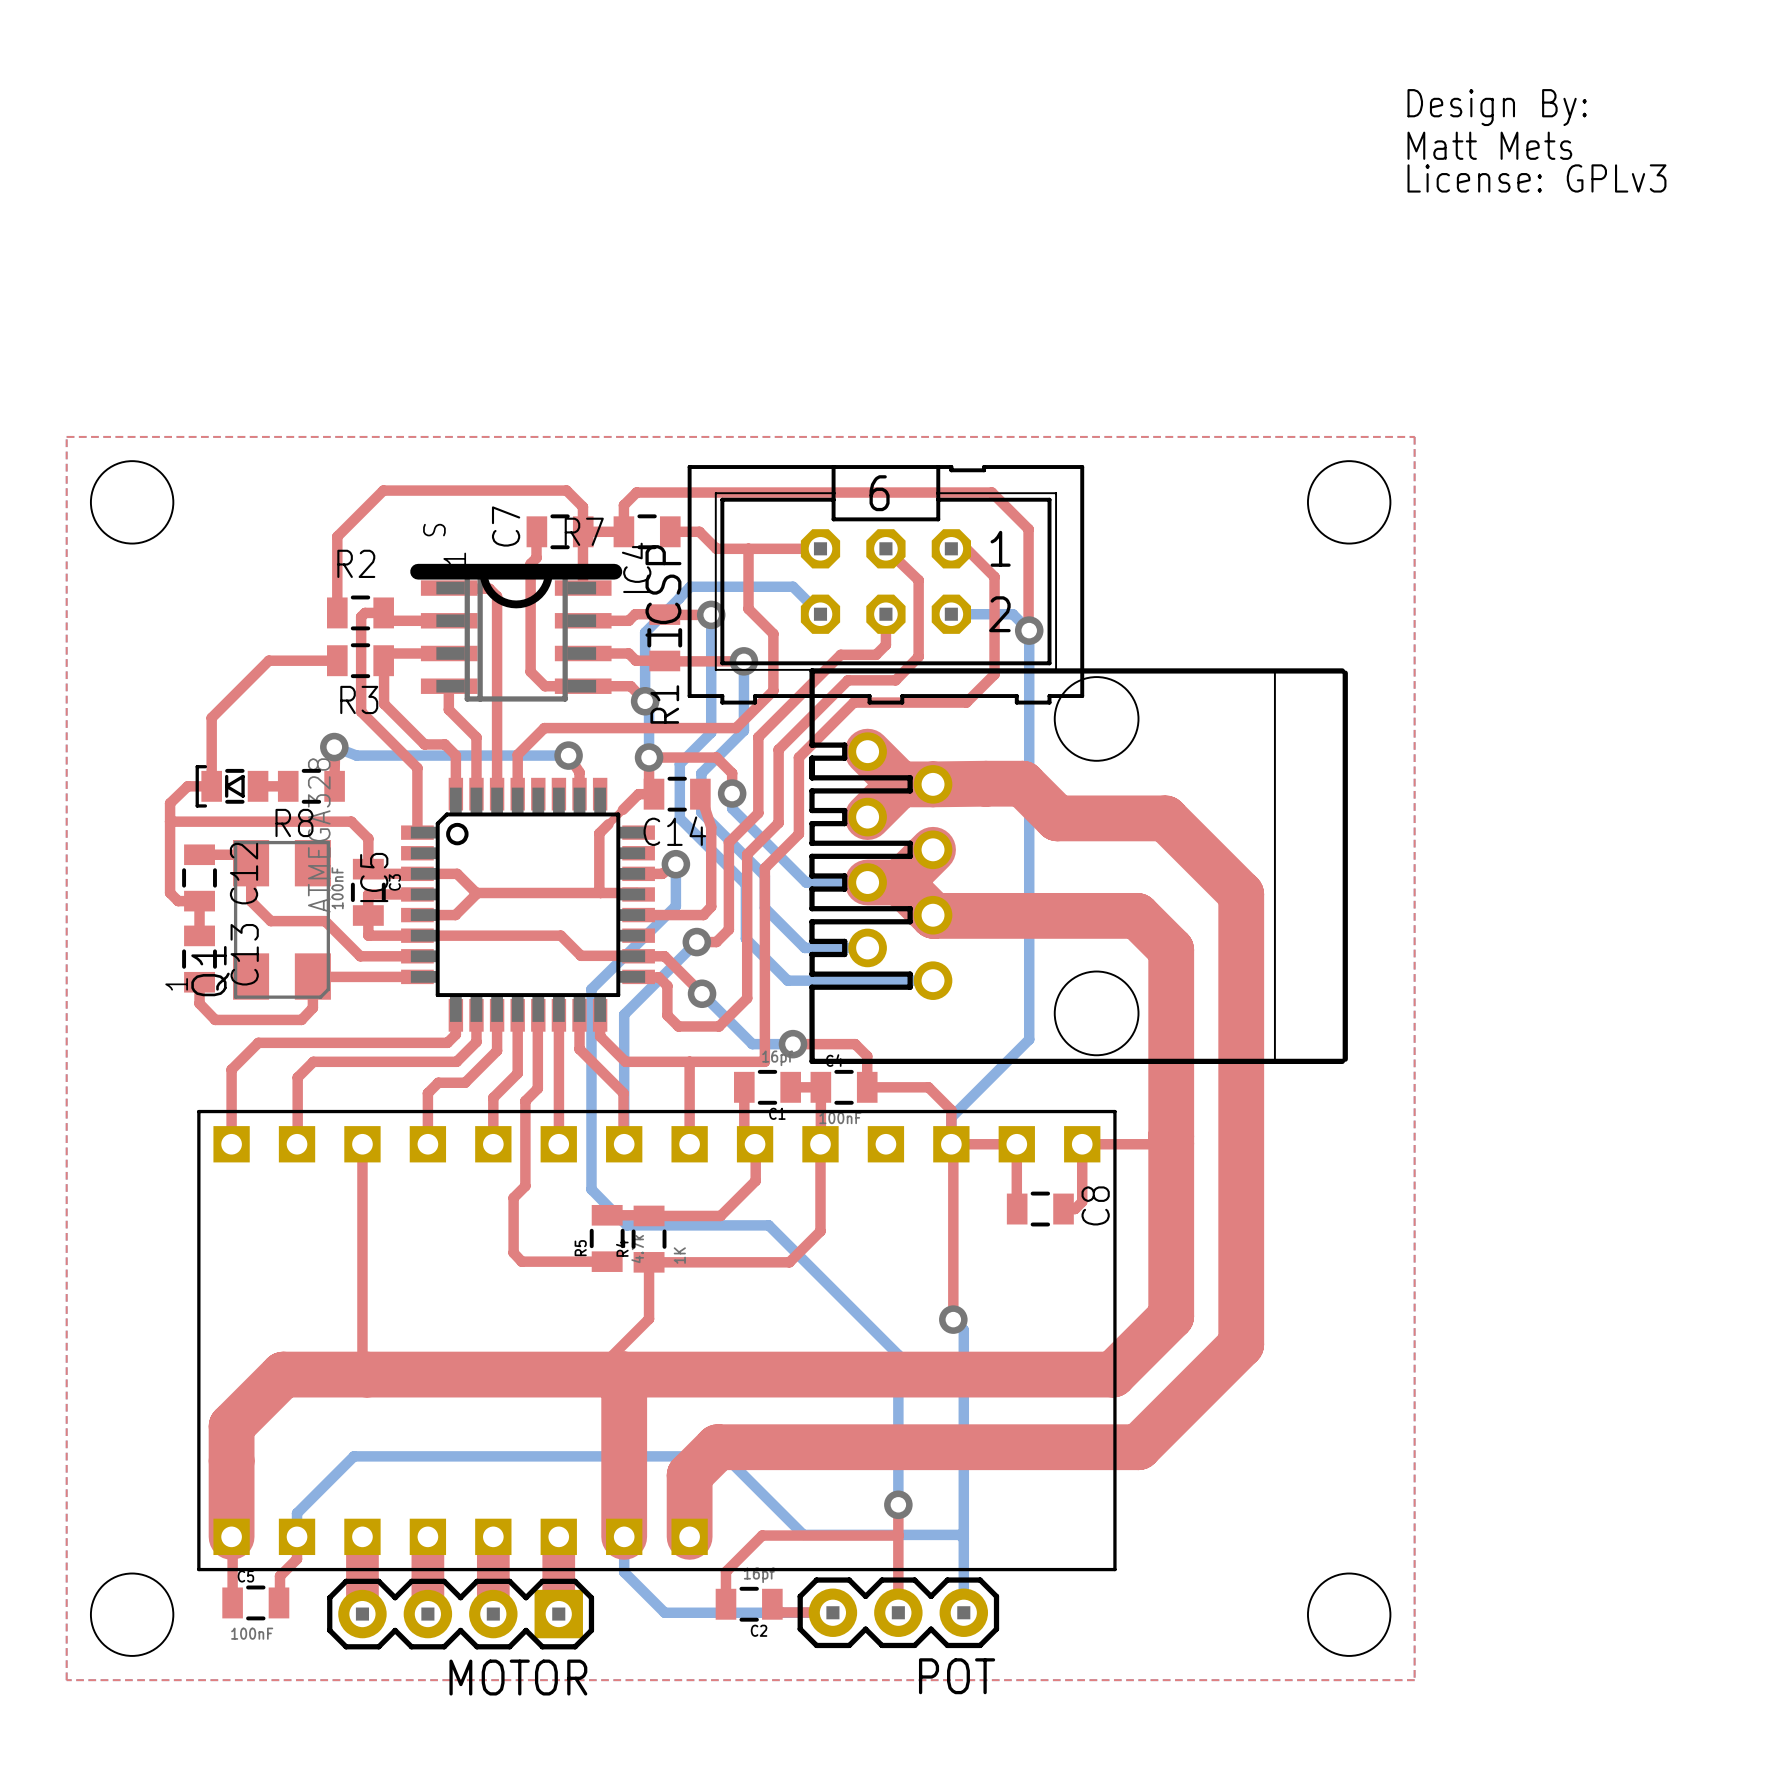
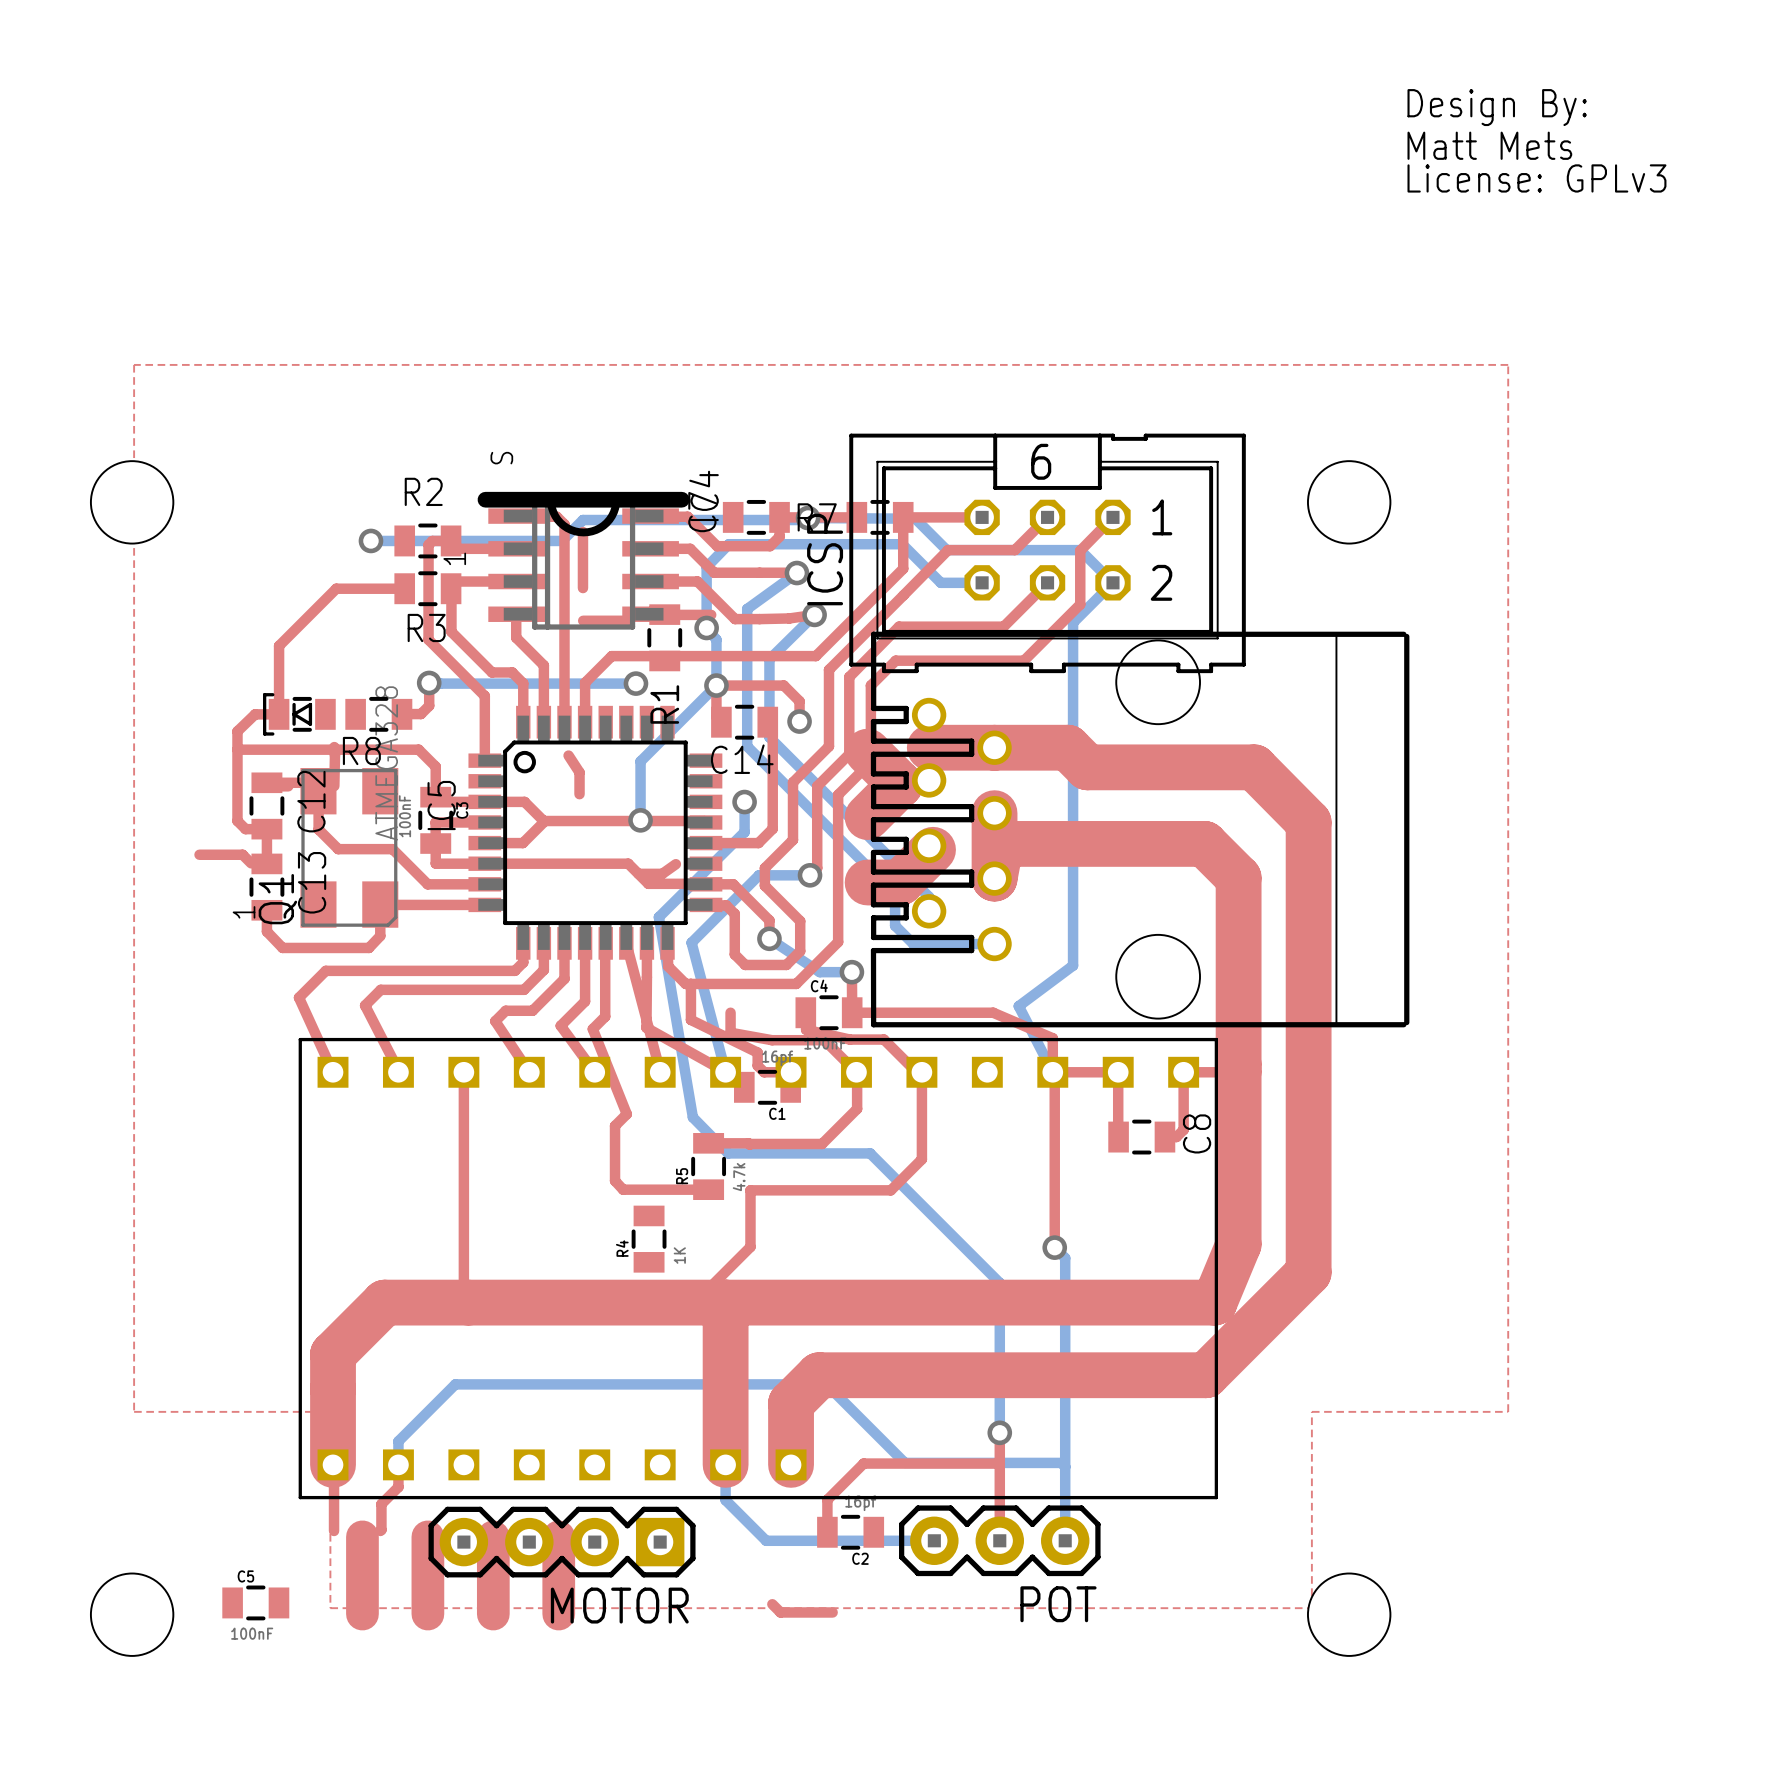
top zone outline: (66, 436) (1414, 436) (1414, 1680) (66, 1680) (66, 436) -> (134, 364) (134, 1411) (330, 1411) (330, 1608) (1311, 1608) (1311, 1411) (1508, 1411) (1508, 364) (134, 364)
top track: none -> (650, 516) (687, 516) (717, 546) (770, 546) (779, 536) (779, 517) (856, 517)
top track: none -> (982, 517) (903, 517) (903, 568) (815, 656) (611, 656) (585, 682) (585, 722)
top track: none -> (1112, 517) (1080, 550) (1080, 604) (1023, 660) (895, 660) (870, 685) (870, 762) (838, 794) (838, 942) (796, 983) (685, 983) (668, 966) (667, 943)
via: none -> (808, 518)
text position: S (434, 530) -> S (501, 458)
top track: (536, 531) (536, 557) (530, 563) (530, 671) (545, 686) (630, 686) (645, 701) -> none
C7 position: (560, 531) -> (756, 517)
top track: (582, 531) (582, 506) (566, 490) (383, 490) (337, 536) (337, 612) -> none
top track: (583, 531) (623, 531) (623, 505) (636, 492) (991, 492) (1028, 529) (1029, 630) -> none
R7 position: (647, 531) -> (880, 517)
top track: (670, 531) (699, 531) (716, 548) (820, 548) -> none
bottom track: none -> (370, 540) (562, 540) (582, 520) (915, 518) (946, 550) (1080, 550) (1112, 582) (1073, 622) (1073, 965) (1018, 1006) (1052, 1072)
via: none -> (370, 540)
top track: none -> (650, 548) (690, 548) (714, 572) (796, 573)
top track: (748, 548) (748, 609) (773, 633) (773, 690) (736, 728) (544, 728) (517, 754) (517, 794) -> none
top track: (885, 548) (918, 580) (918, 656) (895, 680) (847, 680) (778, 749) (778, 822) (772, 828) -> (767, 722) (772, 731) (772, 828)
top track: (951, 548) (966, 548) (994, 576) (994, 674) (966, 702) (853, 702) (798, 757) (798, 834) (793, 839) -> (1047, 517) (1014, 550) (948, 550) (829, 669) (829, 746) (793, 782) (793, 839)
ICSP: none -> (1047, 553)
bottom track: none -> (796, 573) (747, 609) (747, 746) (895, 894) (895, 925) (913, 944) (994, 944)
via: none -> (796, 573)
top track: none -> (650, 581) (697, 581) (735, 619) (789, 618) (814, 614)
bottom track: none -> (982, 582) (940, 582) (902, 544) (728, 544) (706, 567) (706, 627) (716, 639) (716, 685) (640, 761) (640, 820)
top track: none -> (1047, 582) (1003, 626) (899, 626) (849, 677) (849, 754) (817, 786) (817, 868) (810, 875)
ICSP: (885, 584) -> none
top track: (449, 588) (489, 588) (497, 596) (497, 794) -> (516, 516) (556, 516) (564, 524) (564, 722)
R2 position: (360, 612) -> (427, 540)
bottom track: (711, 614) (711, 732) (679, 764) (679, 818) (745, 884) (745, 938) (787, 980) (933, 980) -> none
via position: (711, 614) -> (706, 627)
bottom track: none -> (814, 614) (769, 659) (769, 737) (929, 896) (929, 911)
via: none -> (814, 614)
bottom track: (820, 614) (793, 586) (690, 586) (645, 632) (645, 701) (649, 711) (649, 757) -> none
top track: (885, 614) (885, 644) (876, 654) (840, 654) (758, 737) (758, 813) (728, 842) (728, 929) (716, 942) (696, 942) -> none
bottom track: (951, 614) (1012, 614) (1029, 630) (1029, 1039) (951, 1117) (951, 1144) -> none
top track: (449, 620) (391, 620) (383, 612) (365, 612) (361, 616) (361, 711) (417, 768) (417, 832) -> (516, 548) (458, 548) (451, 540) (432, 540) (428, 544) (428, 639) (484, 696) (484, 760)
via: (1029, 630) -> none
IC4 position: (516, 632) -> (583, 560)
top track: (449, 653) (390, 653) (383, 660) (384, 703) (424, 744) (444, 744) (455, 755) (455, 794) -> (516, 581) (458, 581) (451, 588) (451, 631) (492, 672) (512, 672) (523, 683) (523, 722)
top track: (583, 653) (628, 653) (635, 660) (743, 661) -> none
top track: (337, 660) (268, 660) (211, 717) (211, 786) (187, 786) (170, 803) (170, 892) (178, 901) (199, 901) (199, 935) -> (404, 588) (336, 588) (279, 645) (279, 714) (255, 714) (237, 731) (237, 821) (245, 829) (266, 829) (266, 863)
R3 position: (360, 660) -> (427, 588)
bottom track: (743, 661) (743, 730) (701, 773) (701, 812) (764, 875) (764, 908) (804, 947) (867, 947) -> none
via: (743, 661) -> none
top track: none -> (429, 682) (429, 705) (420, 714) (401, 714)
bottom track: none -> (429, 682) (635, 683)
via: none -> (429, 682)
via: none -> (716, 685)
top track: (449, 686) (448, 709) (476, 737) (476, 794) -> (516, 614) (516, 637) (543, 665) (543, 722)
via position: (645, 701) -> (635, 683)
top track: none -> (799, 721) (799, 701) (783, 685) (716, 685) (716, 717) (721, 722)
via: none -> (799, 721)
bottom track: (334, 747) (356, 755) (568, 755) -> none
via: (334, 747) -> none
top track: none -> (929, 747) (1067, 747) (1087, 767) (1254, 767) (1308, 822) (1308, 1272) (1205, 1375) (819, 1375) (791, 1403) (791, 1464)
top track: none -> (237, 749) (418, 749) (435, 766) (435, 797) (450, 801) (524, 801) (543, 821) (640, 820) (705, 822)
via: (568, 755) -> none
via: (649, 757) -> none
top track: none -> (266, 782) (310, 782) (318, 791) (318, 829) (338, 849) (392, 849) (427, 884) (484, 884)
top track: (900, 784) (1022, 783) (1057, 818) (1165, 818) (1241, 894) (1241, 1344) (1138, 1447) (717, 1447) (689, 1475) (689, 1536) -> none
part position: (231, 786) -> (299, 714)
R8 position: (311, 786) -> (378, 714)
top track: (732, 793) (732, 773) (716, 757) (649, 757) (649, 789) (654, 794) (638, 794) (599, 833) (600, 892) -> none
bottom track: (732, 793) (732, 808) (806, 882) (867, 882) -> none
via position: (732, 793) -> (744, 802)
C14 position: (677, 794) -> (744, 722)
top track: (700, 794) (711, 827) (711, 906) (703, 915) (638, 915) -> none
bottom track: none -> (744, 802) (744, 832) (658, 917) (692, 1117) (728, 1153) (870, 1153) (999, 1282) (999, 1432)
top track: none -> (994, 813) (994, 878) (1001, 843) (1204, 843) (1238, 877) (1238, 1244) (1214, 1302) (384, 1302) (333, 1354) (334, 1530)
via: none -> (640, 820)
top track: (170, 821) (351, 821) (368, 838) (368, 869) (383, 873) (457, 873) (476, 892) (638, 894) -> none
top track: none -> (484, 822) (435, 822) (435, 863) (628, 863) (648, 883) (733, 884) (769, 920) (769, 938)
part: none -> (1140, 829)
top track: (758, 843) (747, 854) (747, 998) (719, 1026) (678, 1026) (667, 1015) (667, 985) (658, 977) (638, 976) -> (758, 843) (705, 843)
top track: (251, 854) (251, 901) (270, 921) (325, 921) (360, 956) (417, 956) -> none
bottom track: (675, 864) (675, 906) (591, 989) (591, 1189) (626, 1225) (768, 1225) (898, 1354) (898, 1504) -> none
via: (675, 864) -> none
part: (1078, 866) -> none
bottom track: none -> (810, 875) (758, 875) (691, 942) (725, 1072)
via: none -> (810, 875)
C12 position: (199, 877) -> (266, 805)
top track: (900, 882) (933, 915) (1137, 915) (1171, 949) (1171, 1316) (1112, 1374) (283, 1374) (231, 1426) (232, 1602) -> none
top track: (764, 885) (764, 1061) (625, 1061) (600, 1036) (600, 1015) -> (764, 885) (800, 921) (800, 951) (786, 964) (745, 964) (734, 954) (734, 913) (726, 905) (705, 904)
C3 position: (368, 892) -> (435, 820)
top track: (477, 892) (455, 915) (417, 915) -> (545, 821) (522, 843) (484, 843)
top track: (417, 894) (368, 894) (368, 935) (560, 935) (581, 955) (664, 956) (702, 993) -> none
IC5 position: (528, 904) -> (595, 832)
Q1 position: (281, 919) -> (349, 847)
bottom track: none -> (769, 938) (819, 972) (851, 972)
via: none -> (769, 938)
bottom track: (696, 942) (624, 1014) (624, 1144) -> none
via: (696, 942) -> none
top track: none -> (523, 943) (523, 962) (514, 970) (325, 970) (298, 997) (333, 1072)
top track: none -> (543, 943) (543, 970) (524, 989) (380, 989) (365, 1005) (398, 1072)
top track: none -> (564, 943) (564, 978) (532, 1010) (505, 1010) (495, 1021) (529, 1072)
top track: none -> (585, 943) (585, 1001) (560, 1025) (594, 1072)
top track: none -> (605, 943) (605, 1016) (592, 1029) (626, 1114) (615, 1125) (615, 1180) (623, 1189) (708, 1189)
top track: none -> (626, 943) (660, 1072)
top track: none -> (646, 943) (646, 1027) (725, 1072)
C13 position: (199, 959) -> (266, 887)
top track: none -> (851, 972) (852, 1012) (993, 1012) (1052, 1038) (1052, 1072)
via: none -> (851, 972)
top track: (417, 976) (312, 976) (312, 1007) (301, 1019) (215, 1019) (199, 1003) (199, 982) -> (484, 904) (380, 904) (380, 936) (369, 947) (282, 947) (266, 931) (266, 910)
top track: none -> (690, 983) (690, 1019) (757, 1052) (757, 1065) (764, 1072) (791, 1072)
text position: 1 (176, 984) -> 1 (244, 912)
bottom track: (702, 993) (752, 1044) (793, 1044) -> none
via: (702, 993) -> none
top track: none -> (730, 1012) (730, 1032) (772, 1040) (824, 1040) (857, 1072) (857, 1108) (822, 1143) (708, 1143)
top track: none -> (806, 1013) (806, 1029) (849, 1039) (883, 1039) (916, 1071) (922, 1071) (921, 1159) (890, 1190) (750, 1190) (750, 1246) (700, 1297) (705, 1302) (726, 1302) (724, 1465)
top track: (455, 1015) (455, 1034) (447, 1042) (258, 1042) (231, 1069) (231, 1144) -> none
top track: (476, 1015) (476, 1042) (456, 1061) (313, 1061) (297, 1077) (297, 1144) -> none
top track: (497, 1015) (497, 1050) (465, 1082) (438, 1082) (427, 1093) (427, 1144) -> none
top track: (517, 1015) (517, 1073) (493, 1097) (493, 1144) -> none
top track: (538, 1015) (537, 1088) (525, 1101) (525, 1186) (513, 1197) (513, 1252) (521, 1261) (607, 1261) -> none
top track: (558, 1015) (558, 1144) -> none
top track: (579, 1015) (579, 1049) (623, 1093) (624, 1144) -> none
top track: (793, 1044) (855, 1044) (867, 1056) (867, 1087) (928, 1087) (951, 1110) (951, 1144) -> none
via: (793, 1044) -> none
top track: (689, 1061) (689, 1144) -> none
top track: none -> (1238, 1064) (1230, 1072) (1183, 1072) (1183, 1129) (1176, 1137) (1164, 1137)
top track: (744, 1087) (744, 1133) (755, 1144) (755, 1180) (720, 1215) (607, 1215) -> none
top track: (790, 1087) (820, 1087) (820, 1231) (789, 1262) (649, 1262) (649, 1318) (598, 1369) (603, 1374) (624, 1374) (623, 1537) -> none
C4 position: (844, 1087) -> (829, 1012)
top track: (1171, 1136) (1163, 1144) (1082, 1144) (1082, 1201) (1075, 1209) (1063, 1209) -> none
top track: (362, 1144) (362, 1370) (367, 1374) -> (463, 1072) (463, 1298) (468, 1302)
top track: (951, 1144) (1016, 1144) (1017, 1209) -> (1052, 1072) (1118, 1072) (1118, 1137)
top track: (951, 1144) (953, 1146) (953, 1319) -> (1052, 1072) (1054, 1074) (1054, 1247)
C8 position: (1040, 1209) -> (1141, 1137)
R5 position: (607, 1238) -> (708, 1166)
via: none -> (1054, 1247)
part: none -> (758, 1268)
bottom track: (953, 1319) (963, 1330) (963, 1612) -> (1054, 1247) (1065, 1258) (1065, 1540)
via: (953, 1319) -> none
part: (656, 1340) -> none
via: none -> (999, 1432)
top track: (898, 1504) (898, 1612) -> (999, 1432) (999, 1540)
via: (898, 1504) -> none
top track: (898, 1535) (762, 1535) (725, 1571) (725, 1604) -> (999, 1463) (863, 1463) (827, 1499) (827, 1532)
top track: (297, 1536) (297, 1559) (280, 1576) (278, 1602) -> (398, 1464) (398, 1487) (381, 1504) (380, 1530)
bottom track: (297, 1536) (297, 1513) (353, 1456) (724, 1456) (803, 1534) (959, 1534) (963, 1538) -> (398, 1464) (398, 1441) (455, 1384) (826, 1384) (904, 1462) (1061, 1462) (1065, 1466)
bottom track: (624, 1536) (624, 1572) (664, 1612) (832, 1612) -> (725, 1464) (725, 1500) (766, 1540) (934, 1540)
C2 position: (749, 1604) -> (850, 1532)
POT position: (898, 1612) -> (999, 1540)
MOTOR position: (460, 1614) -> (562, 1542)

